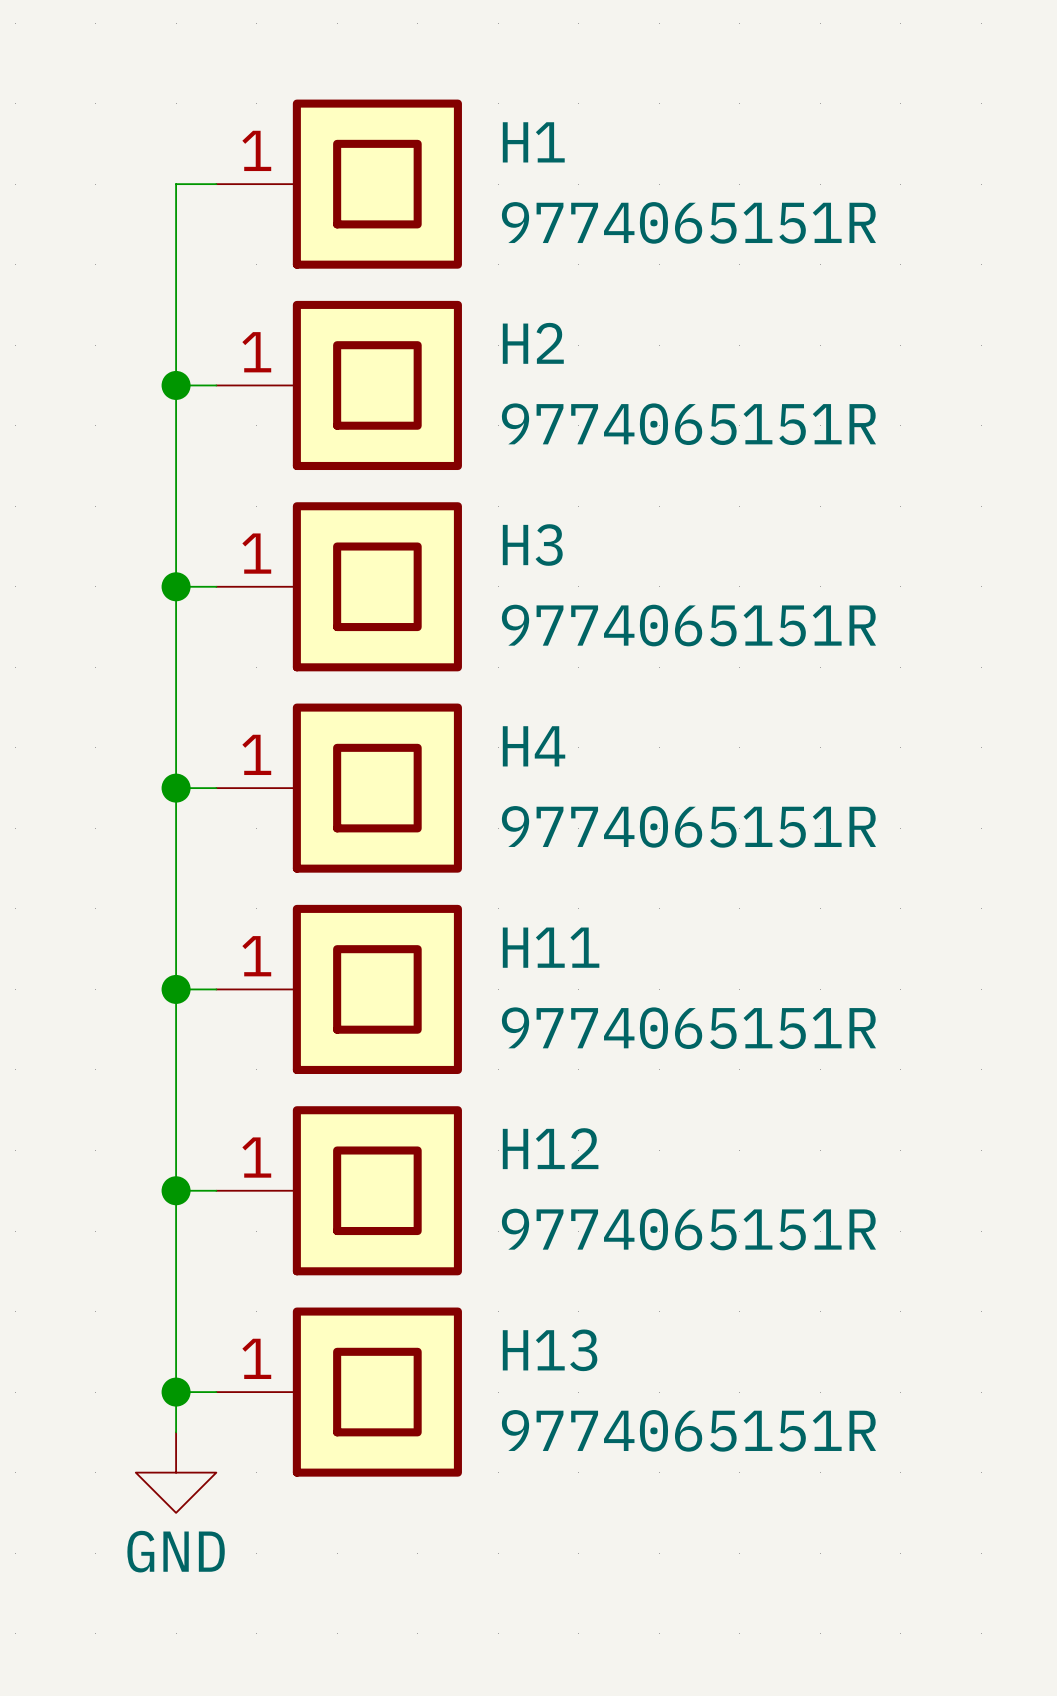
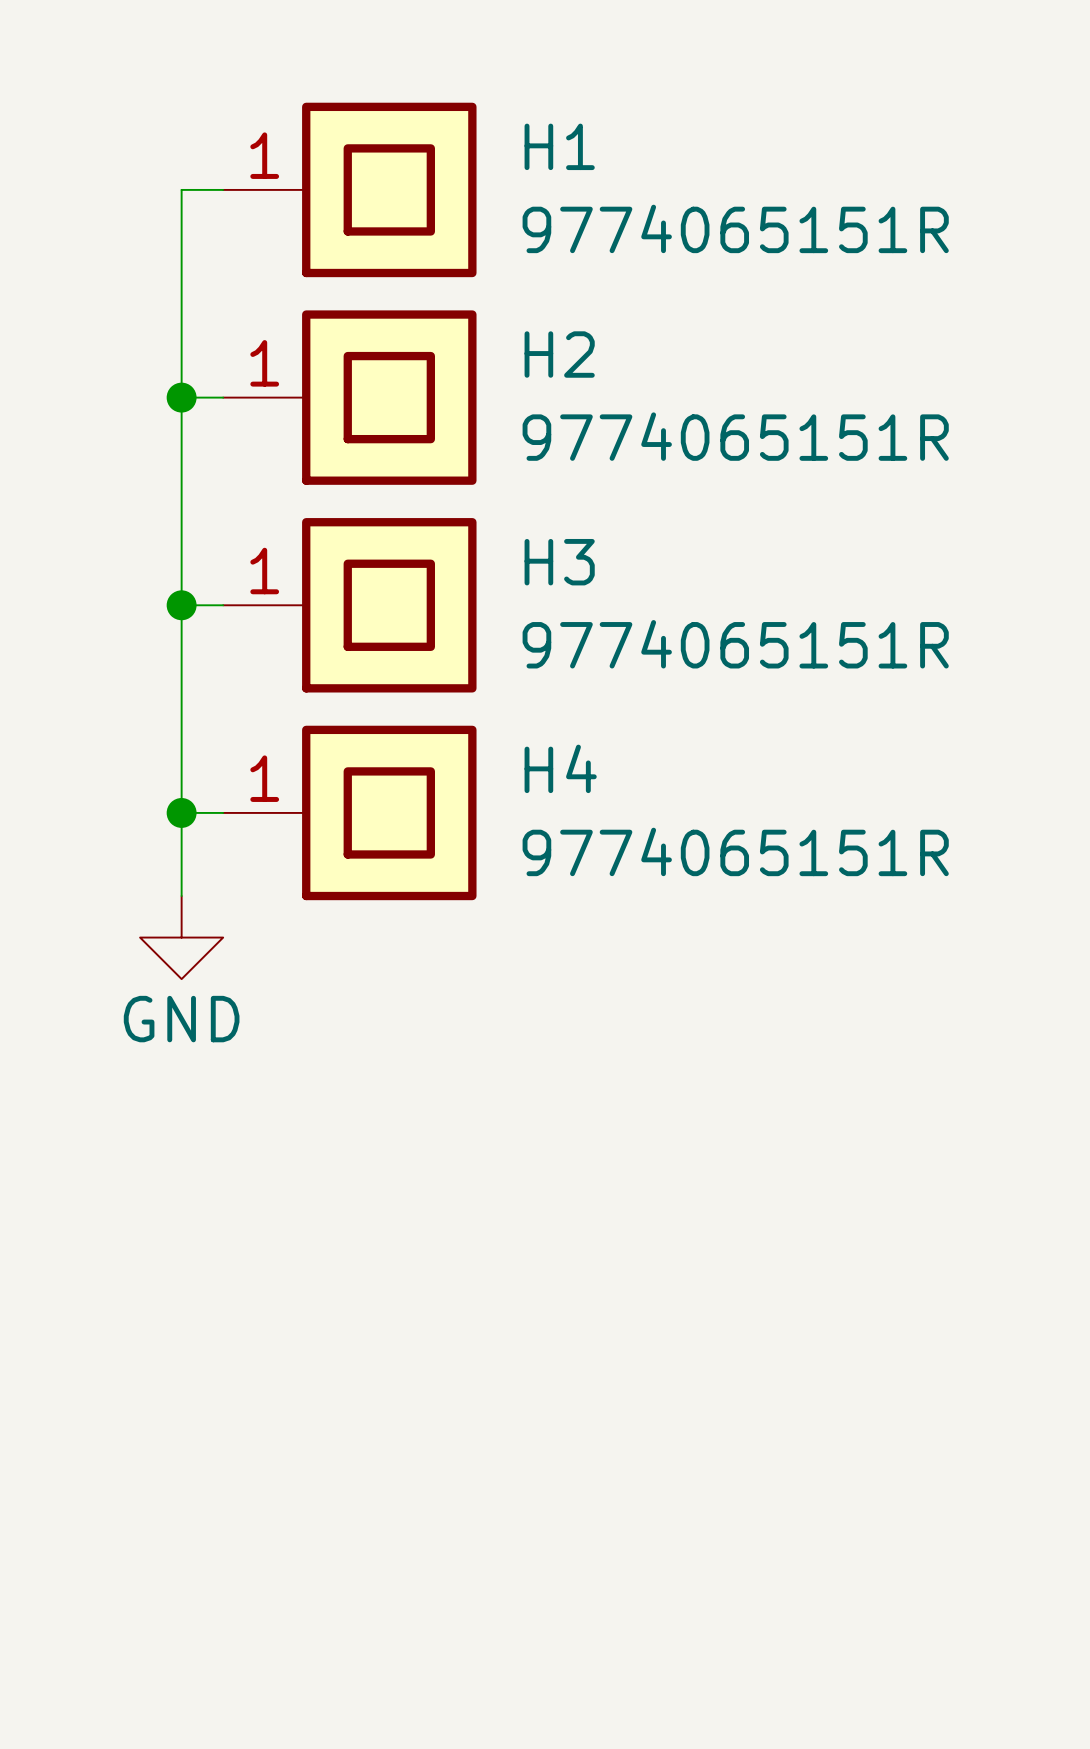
wire: (176, 868) (176, 1432) -> none
wire: (176, 989) (216, 989) -> none
junction: (176, 989) -> none
H11: (339, 989) -> none
wire: (176, 1190) (216, 1190) -> none
junction: (176, 1190) -> none
H12: (339, 1190) -> none
wire: (176, 1392) (216, 1392) -> none
junction: (176, 1392) -> none
H13: (339, 1392) -> none
power symbol position: GND (176, 1472) -> GND (181, 937)

